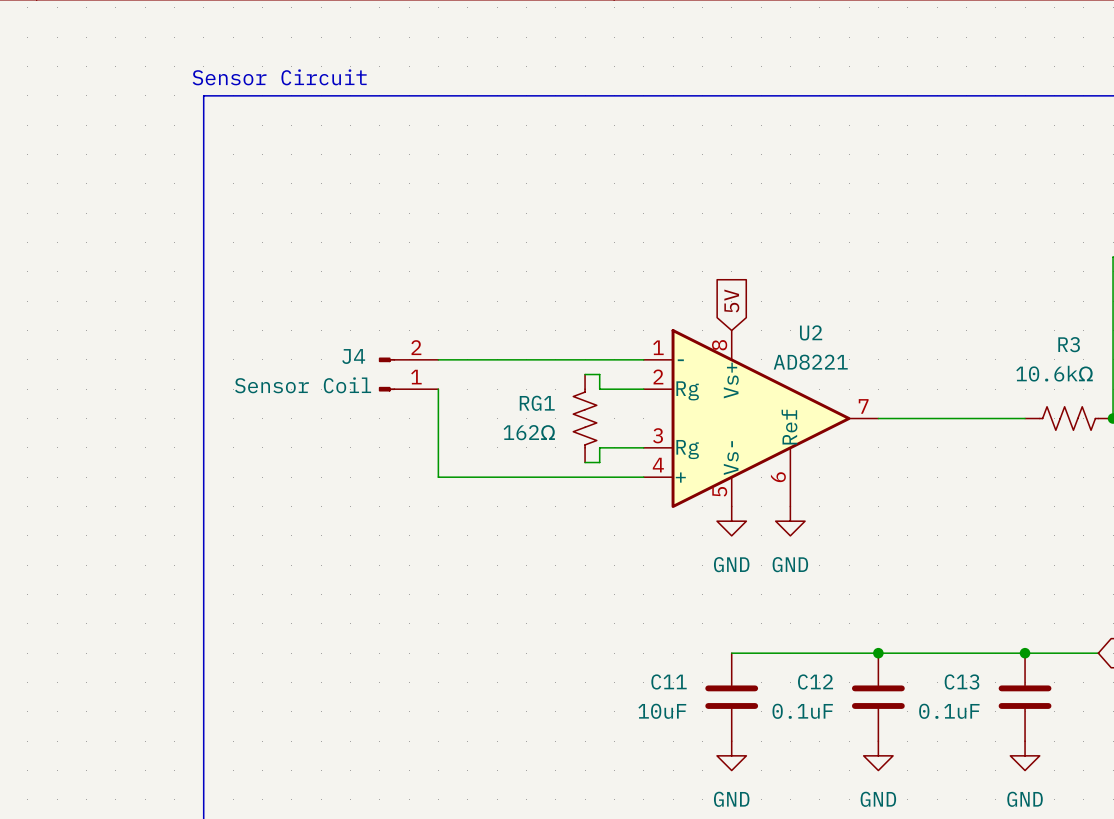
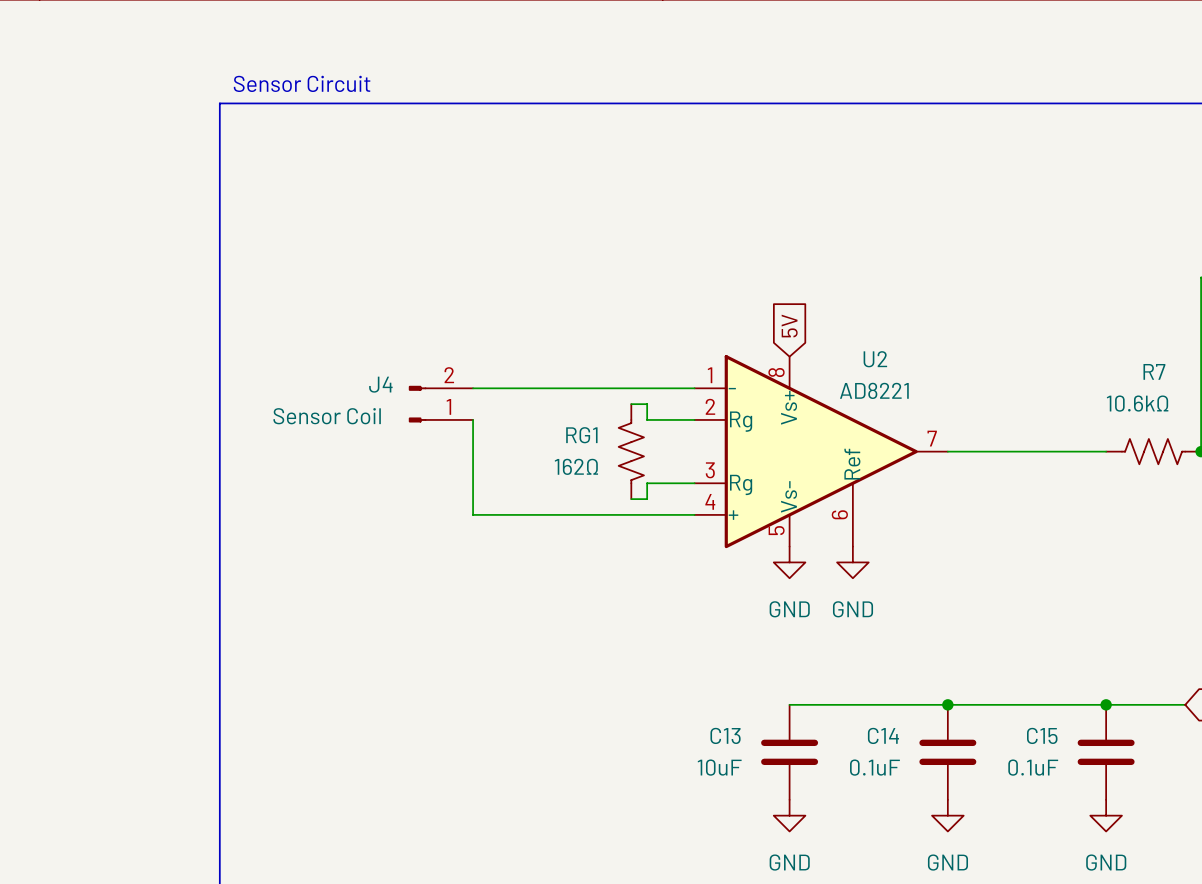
R3 name: R3 (1069, 344) -> R7 (1154, 371)
C11 name: C11 (669, 681) -> C13 (725, 735)
C12 name: C12 (815, 681) -> C14 (883, 735)
C13 name: C13 (961, 681) -> C15 (1042, 735)

